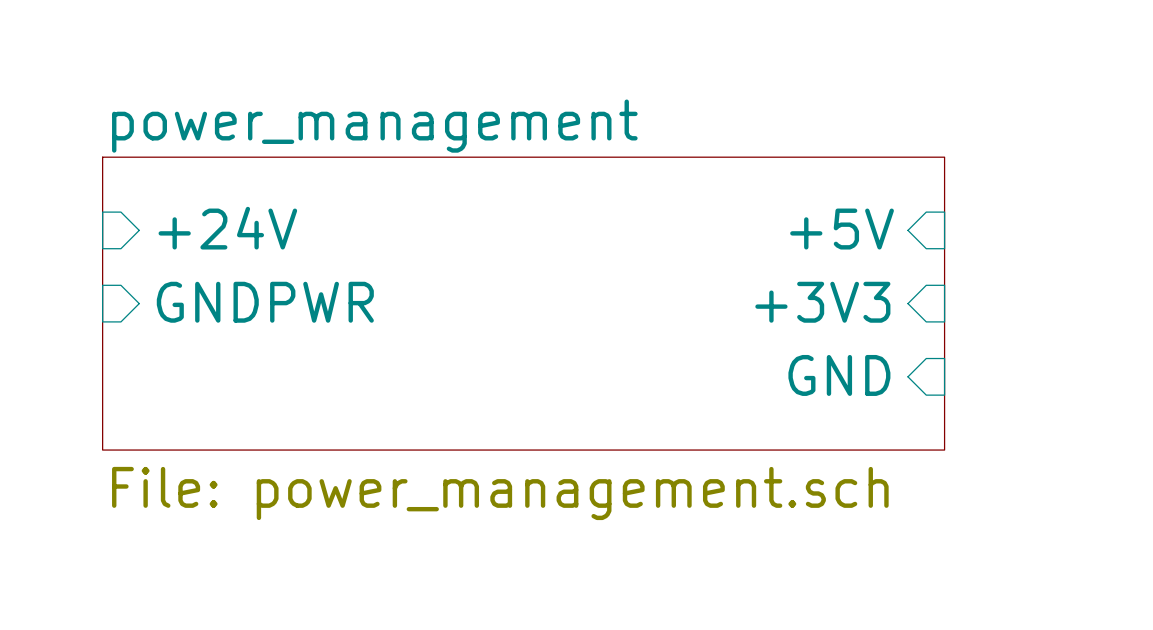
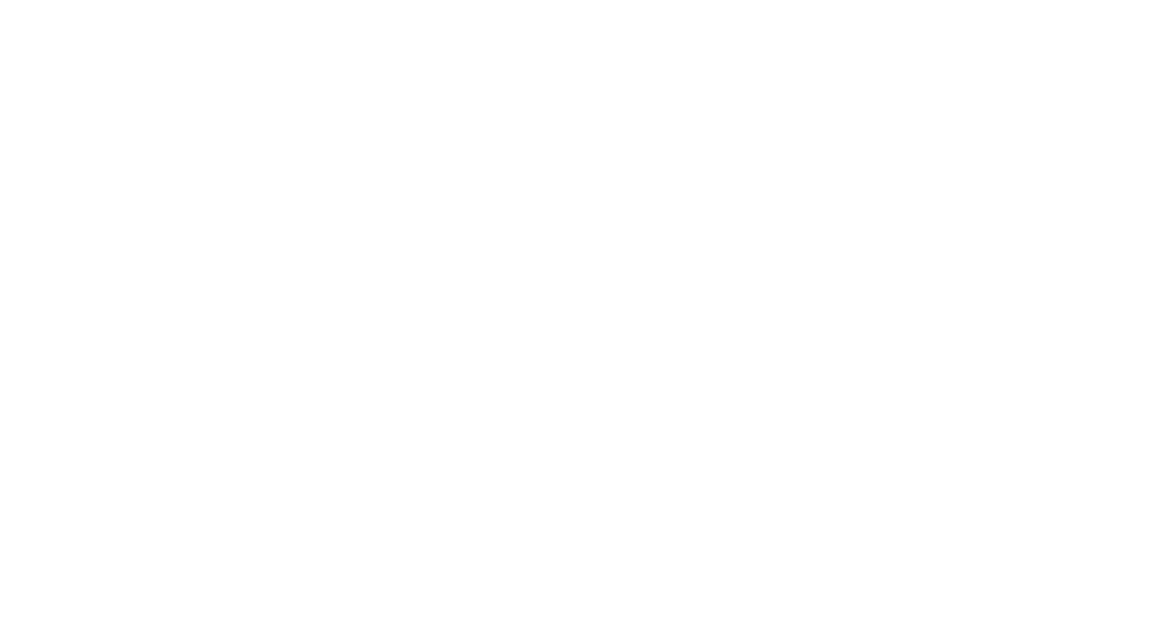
sheet pin: +24V (227, 228) -> none
sheet pin: +5V (842, 229) -> none
sheet pin: GNDPWR (265, 302) -> none
sheet pin: +3V3 (822, 302) -> none
sheet power_management: File: power_management.sch (523, 303) -> none
sheet pin: GND (839, 375) -> none

